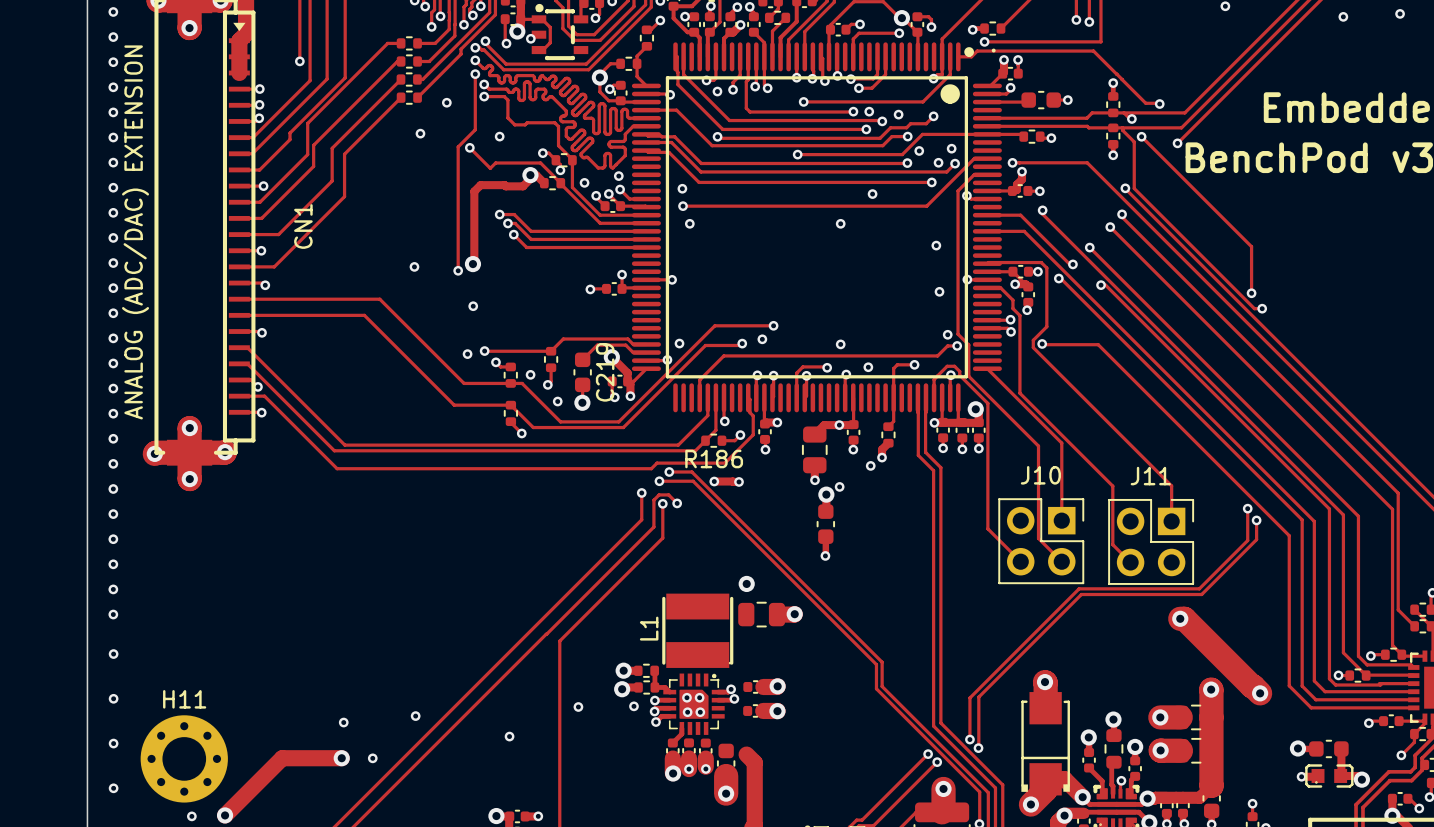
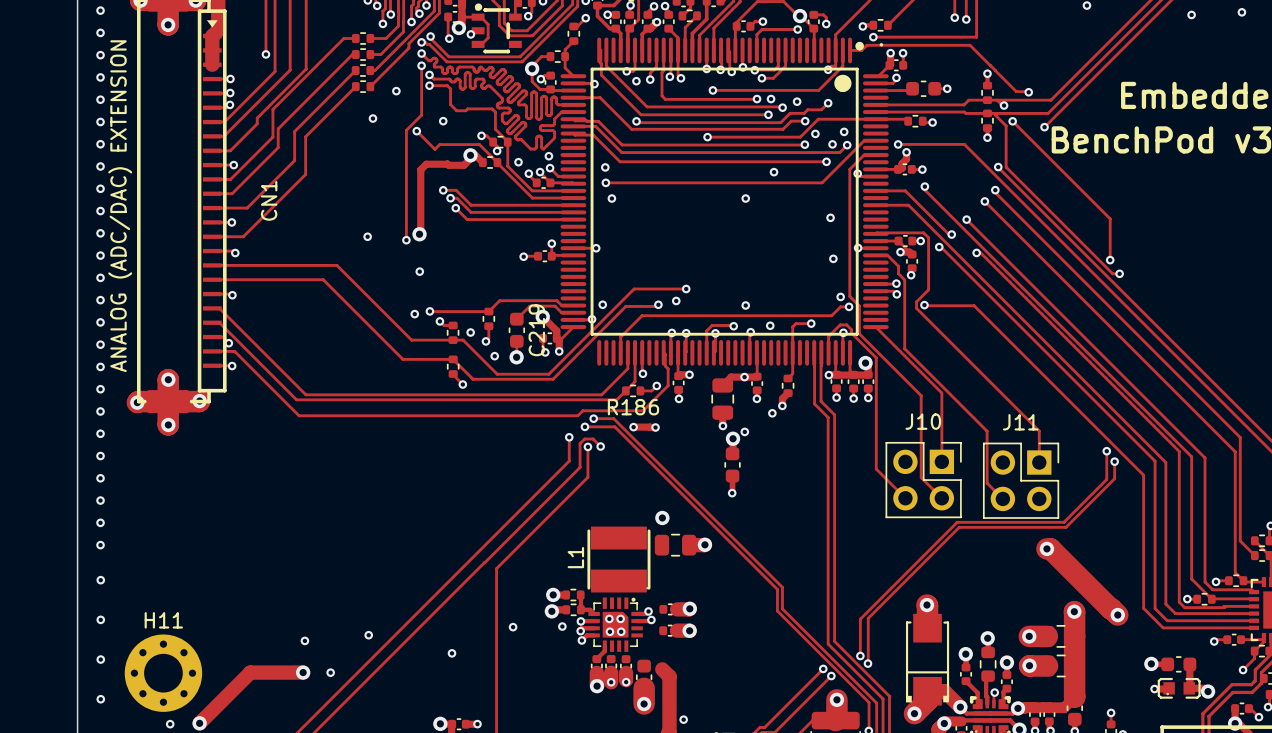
via: none -> (683, 719)

